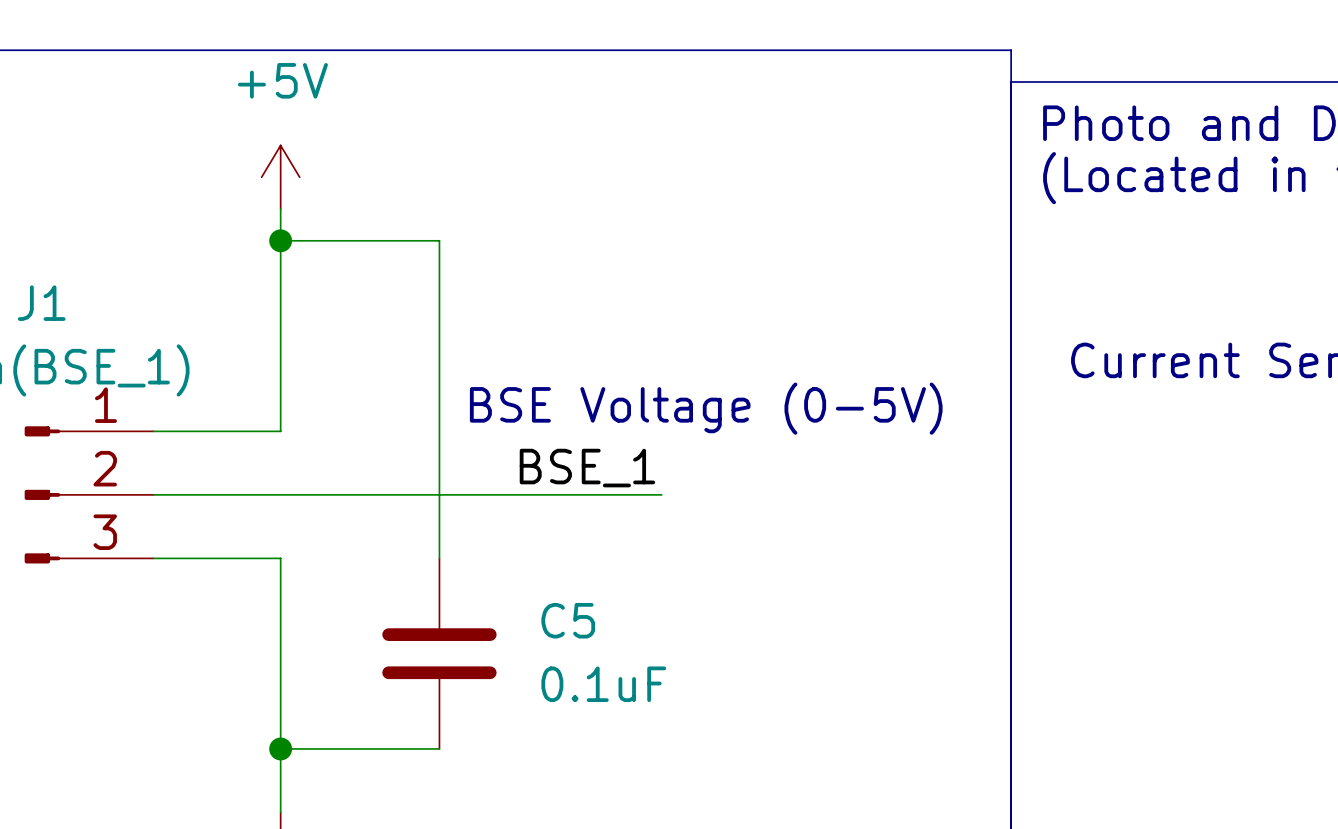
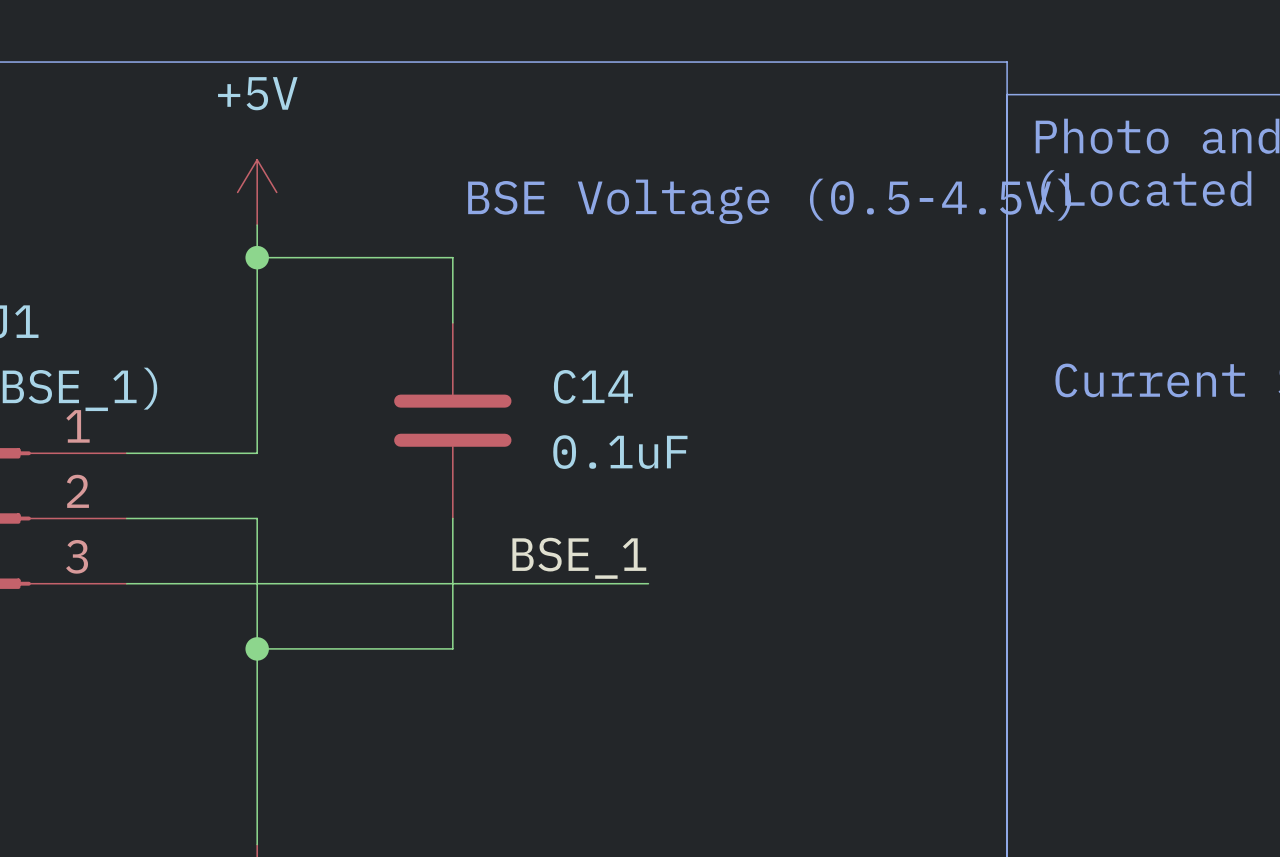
text: none -> BSE Voltage (0.5-4.5V) (769, 201)
wire: (439, 240) (439, 558) -> (420, 257) (452, 257) (452, 322)
C14: none -> 0.1uF (452, 420)
text: BSE Voltage (0-5V) (706, 408) -> none
label position: BSE_1 (587, 468) -> BSE_1 (579, 558)
wire: (280, 494) (661, 494) -> (257, 518) (257, 583) (648, 583)
wire: none -> (452, 518) (452, 648) (257, 648)
C5: 0.1uF (439, 653) -> none
wire: (280, 748) (439, 748) -> none
junction position: (280, 748) -> (257, 648)

